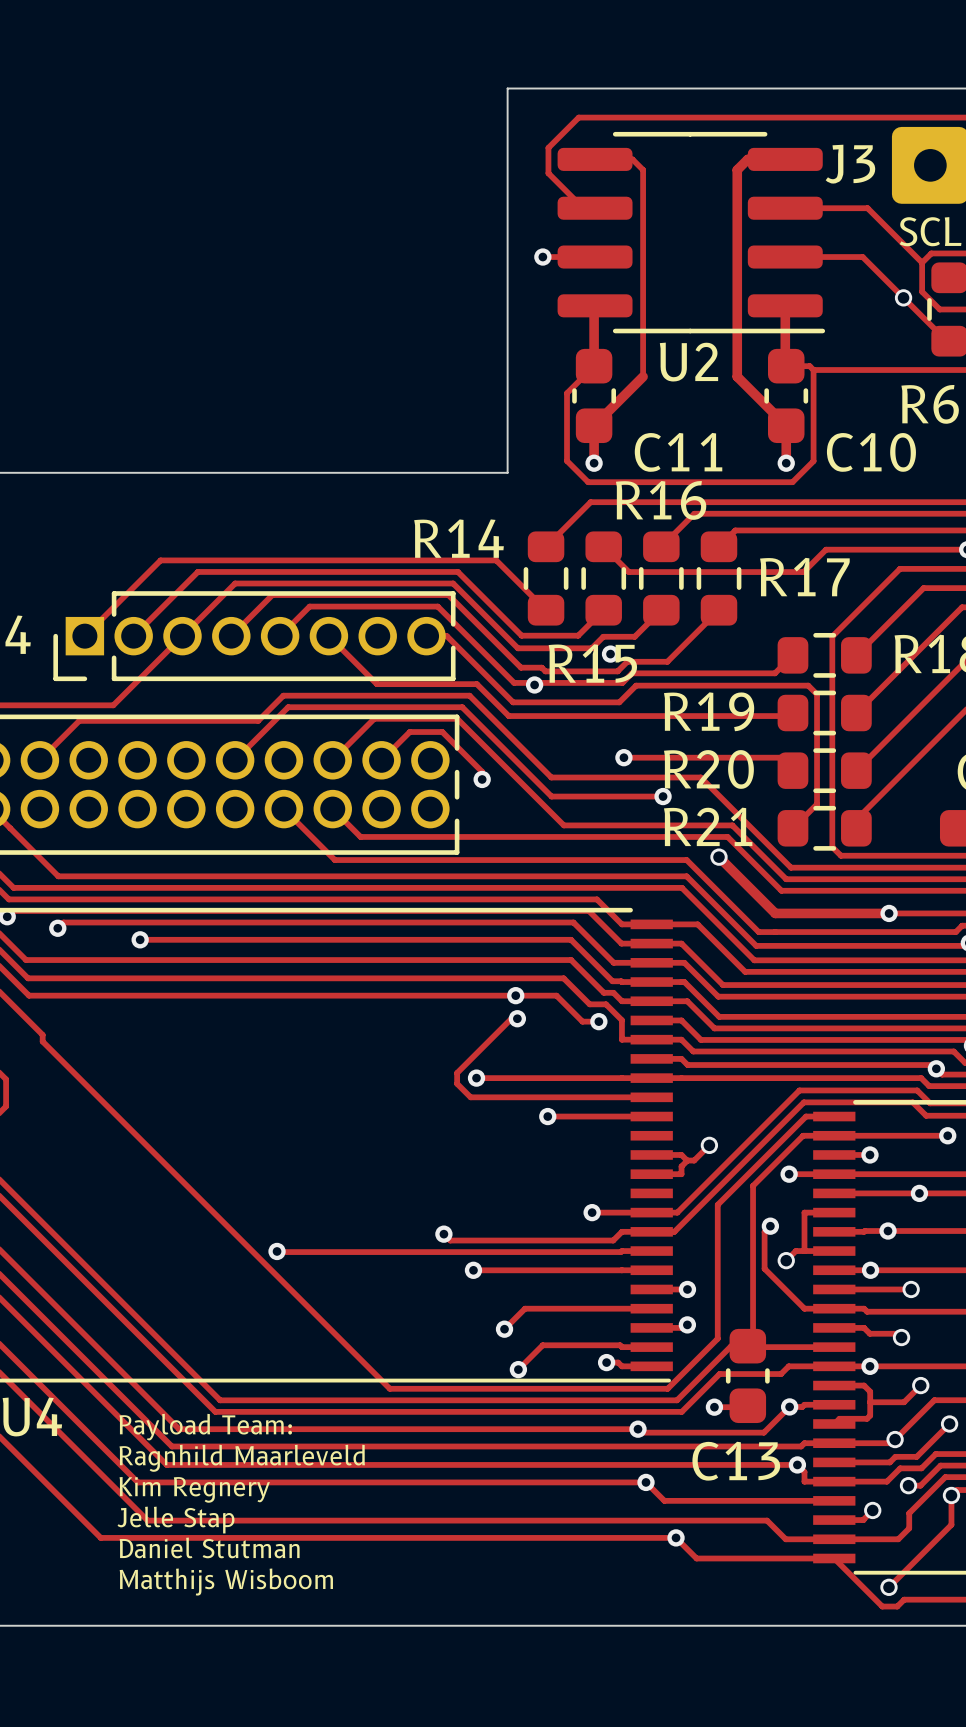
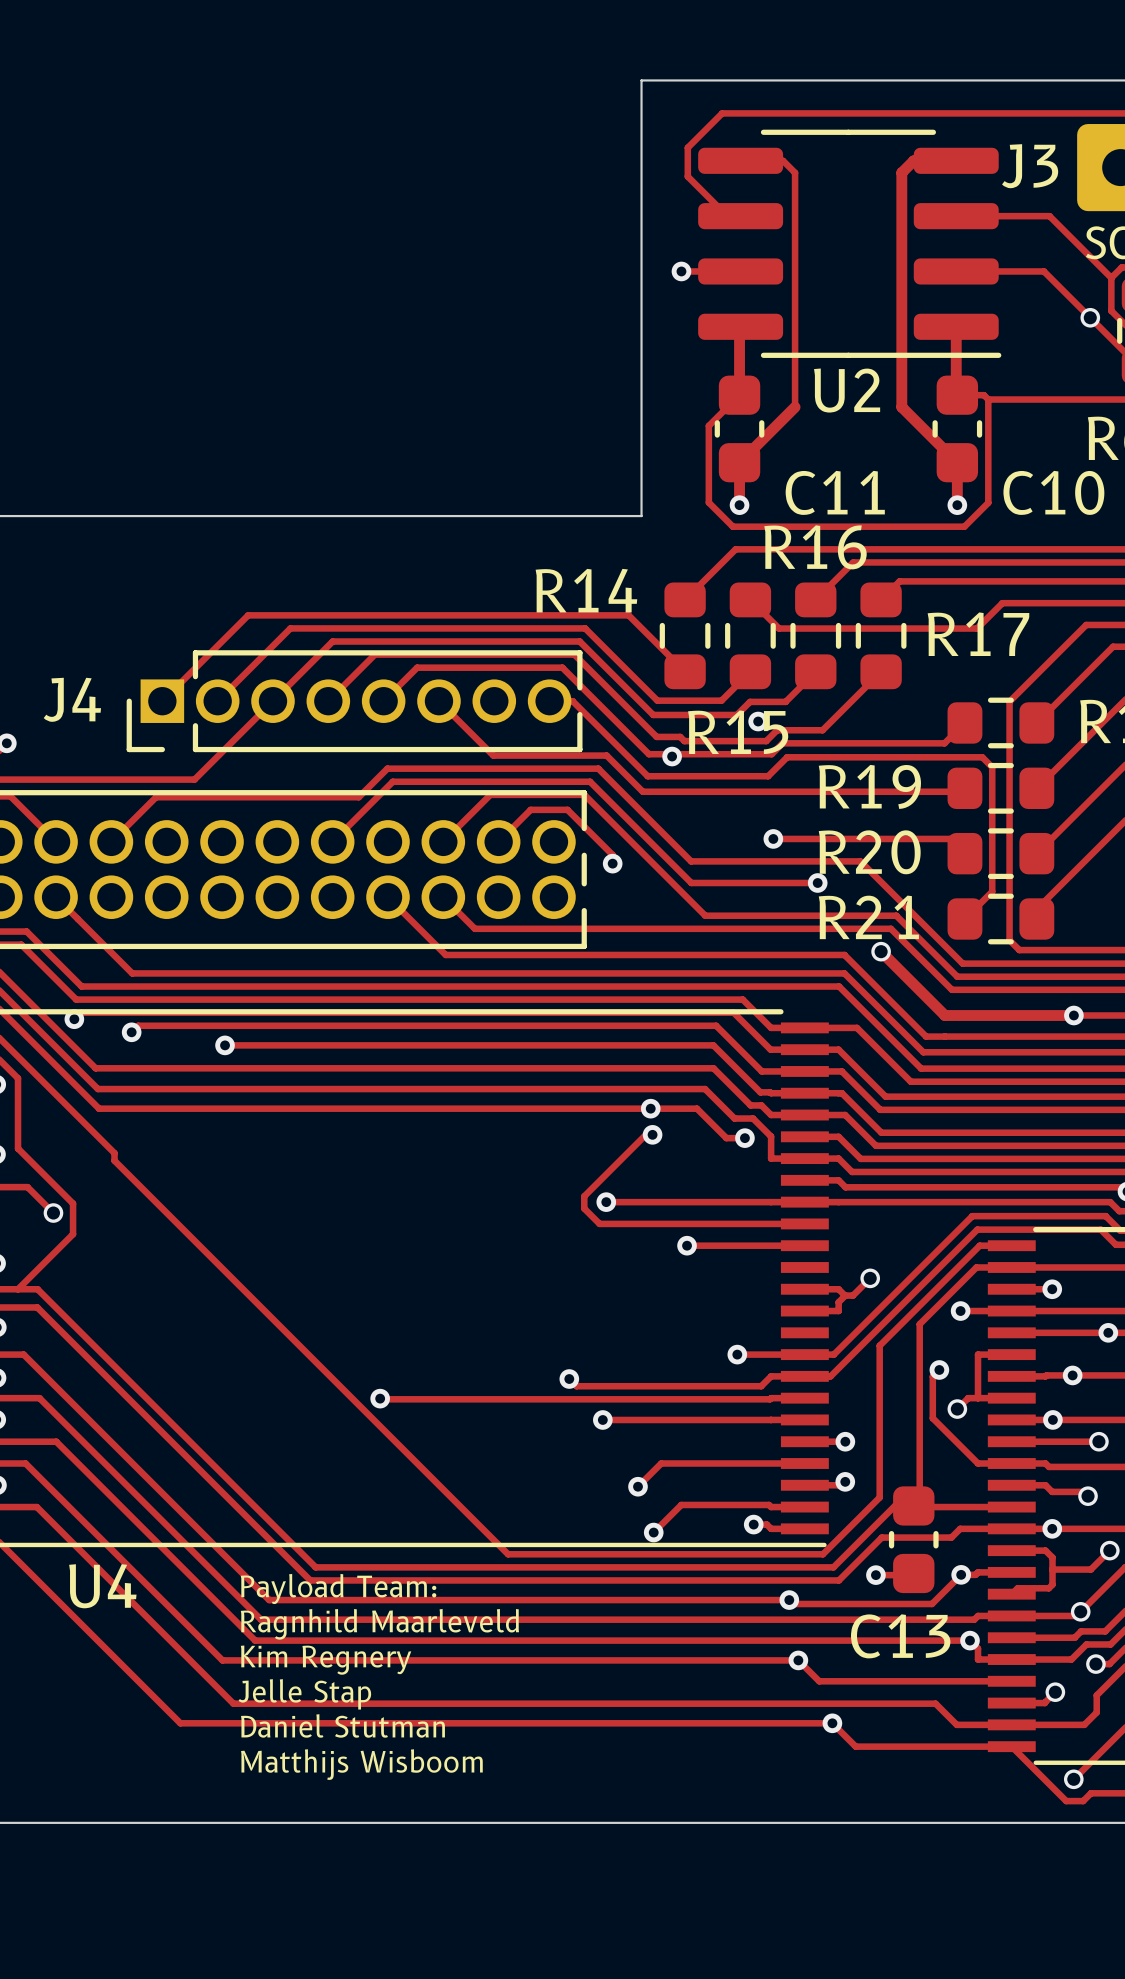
text position: Payload Team: (205, 1427) -> Payload Team: (338, 1589)
text position: Ragnhild Maarleveld (242, 1458) -> Ragnhild Maarleveld (379, 1624)
text position: Kim Regnery (194, 1489) -> Kim Regnery (326, 1660)
text position: Jelle Stap (176, 1520) -> Jelle Stap (304, 1694)
text position: Daniel Stutman (209, 1547) -> Daniel Stutman (342, 1725)
text position: Matthijs Wisboom (226, 1582) -> Matthijs Wisboom (361, 1764)

